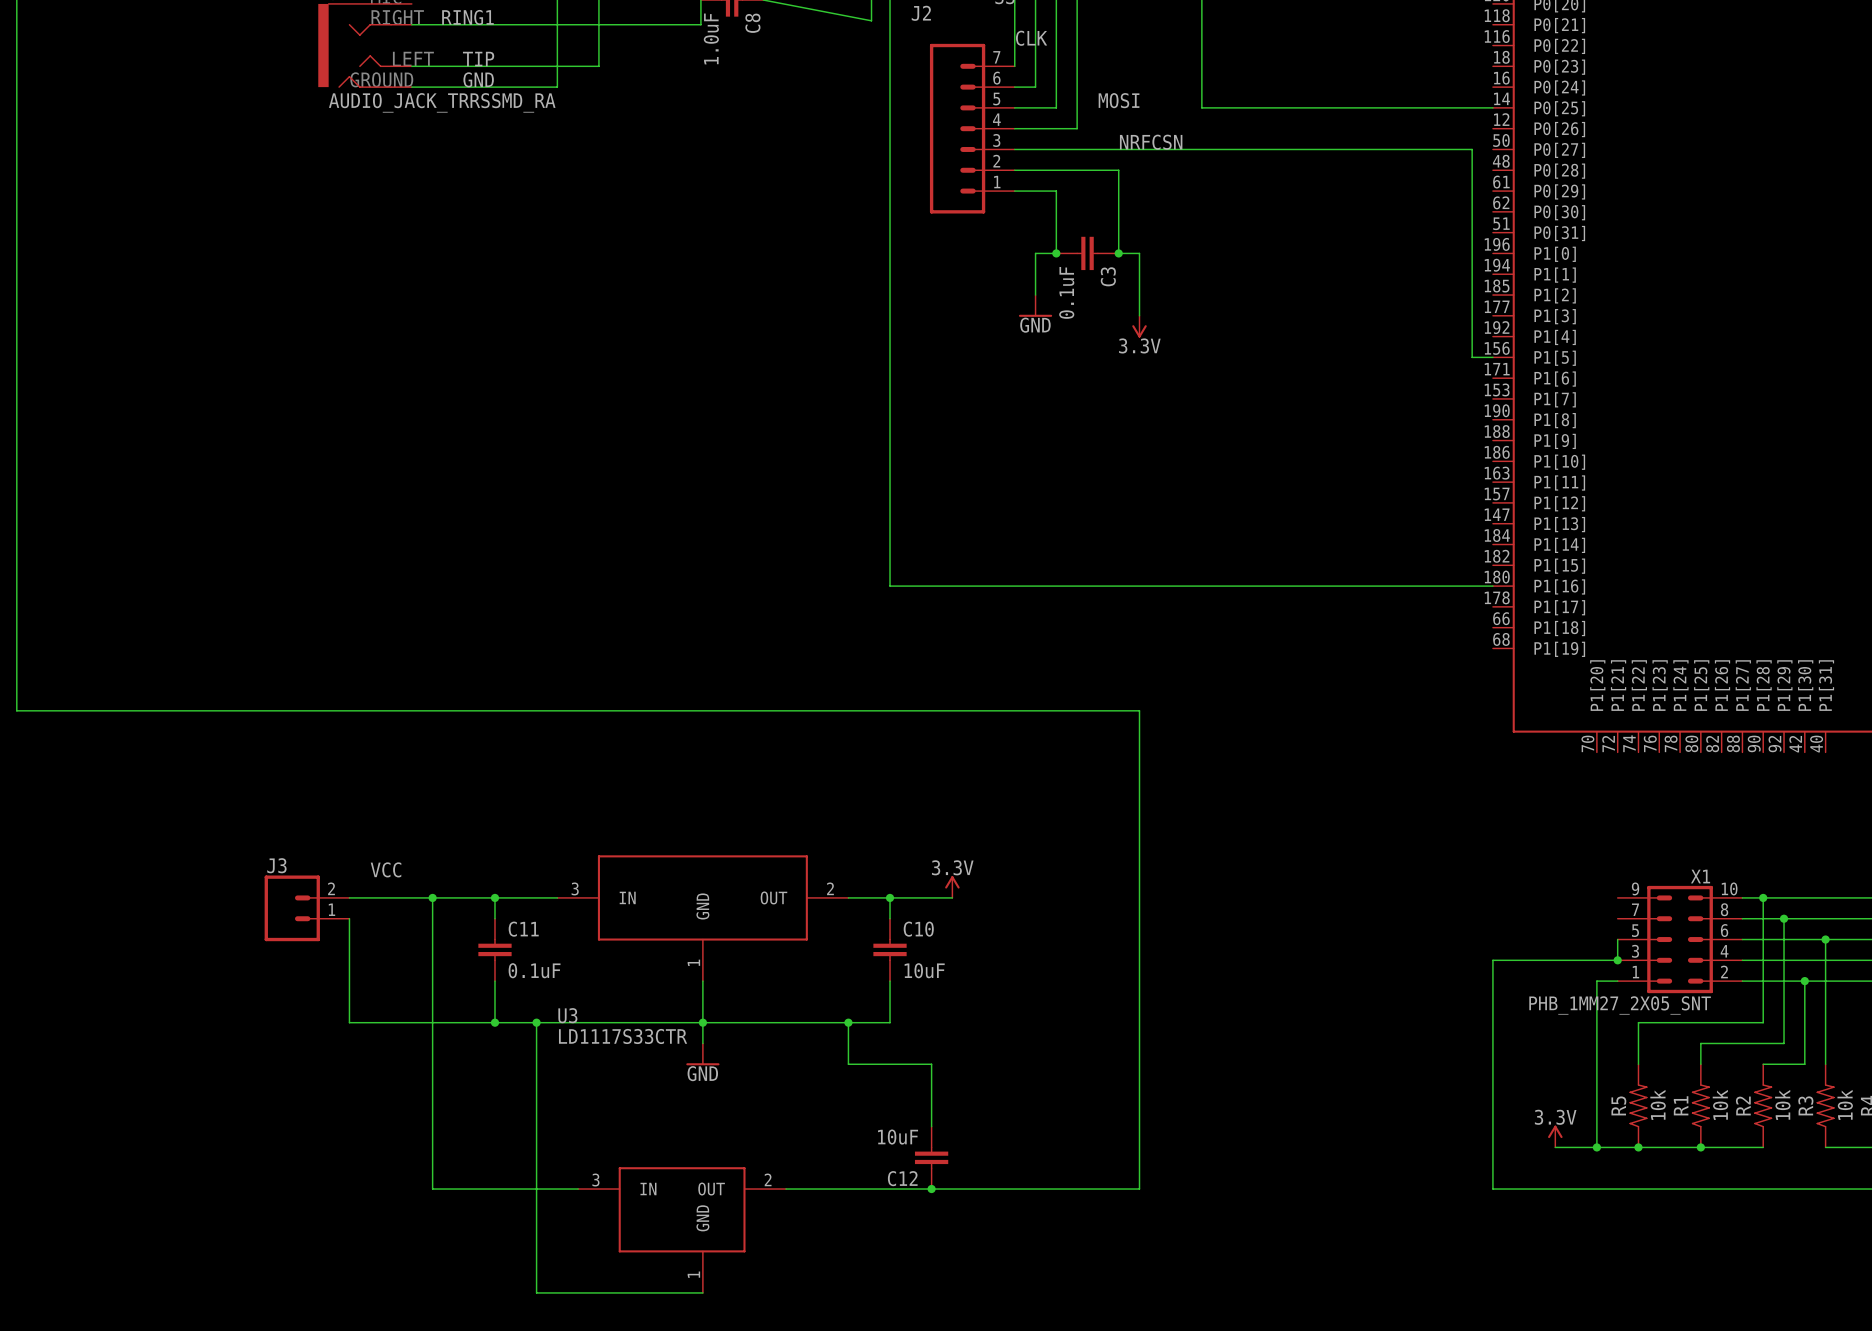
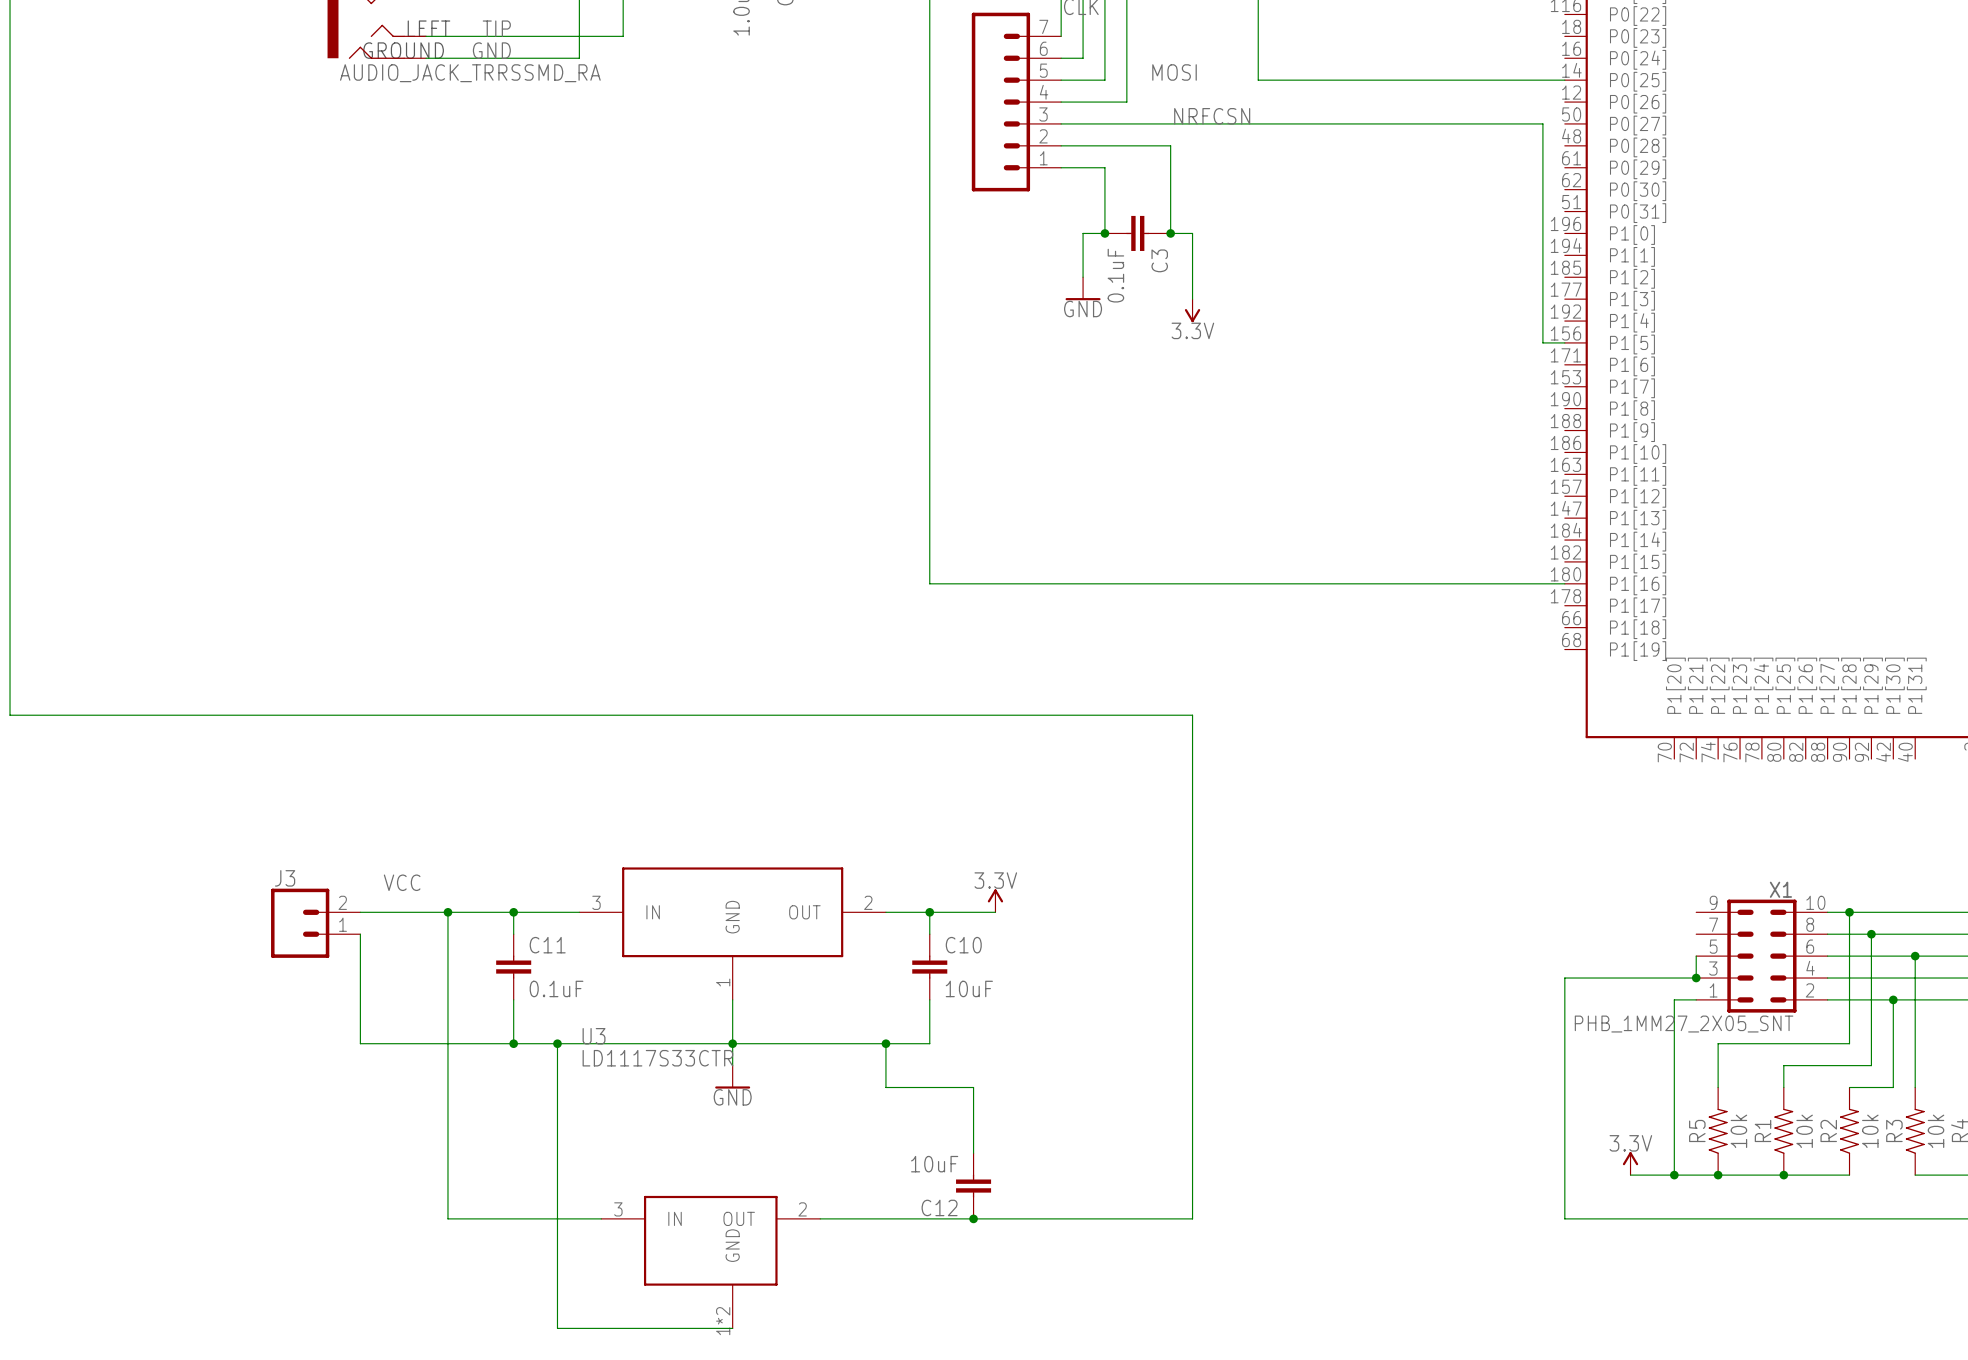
part pin number: 1 (693, 1274) -> 1*2 (723, 1321)

